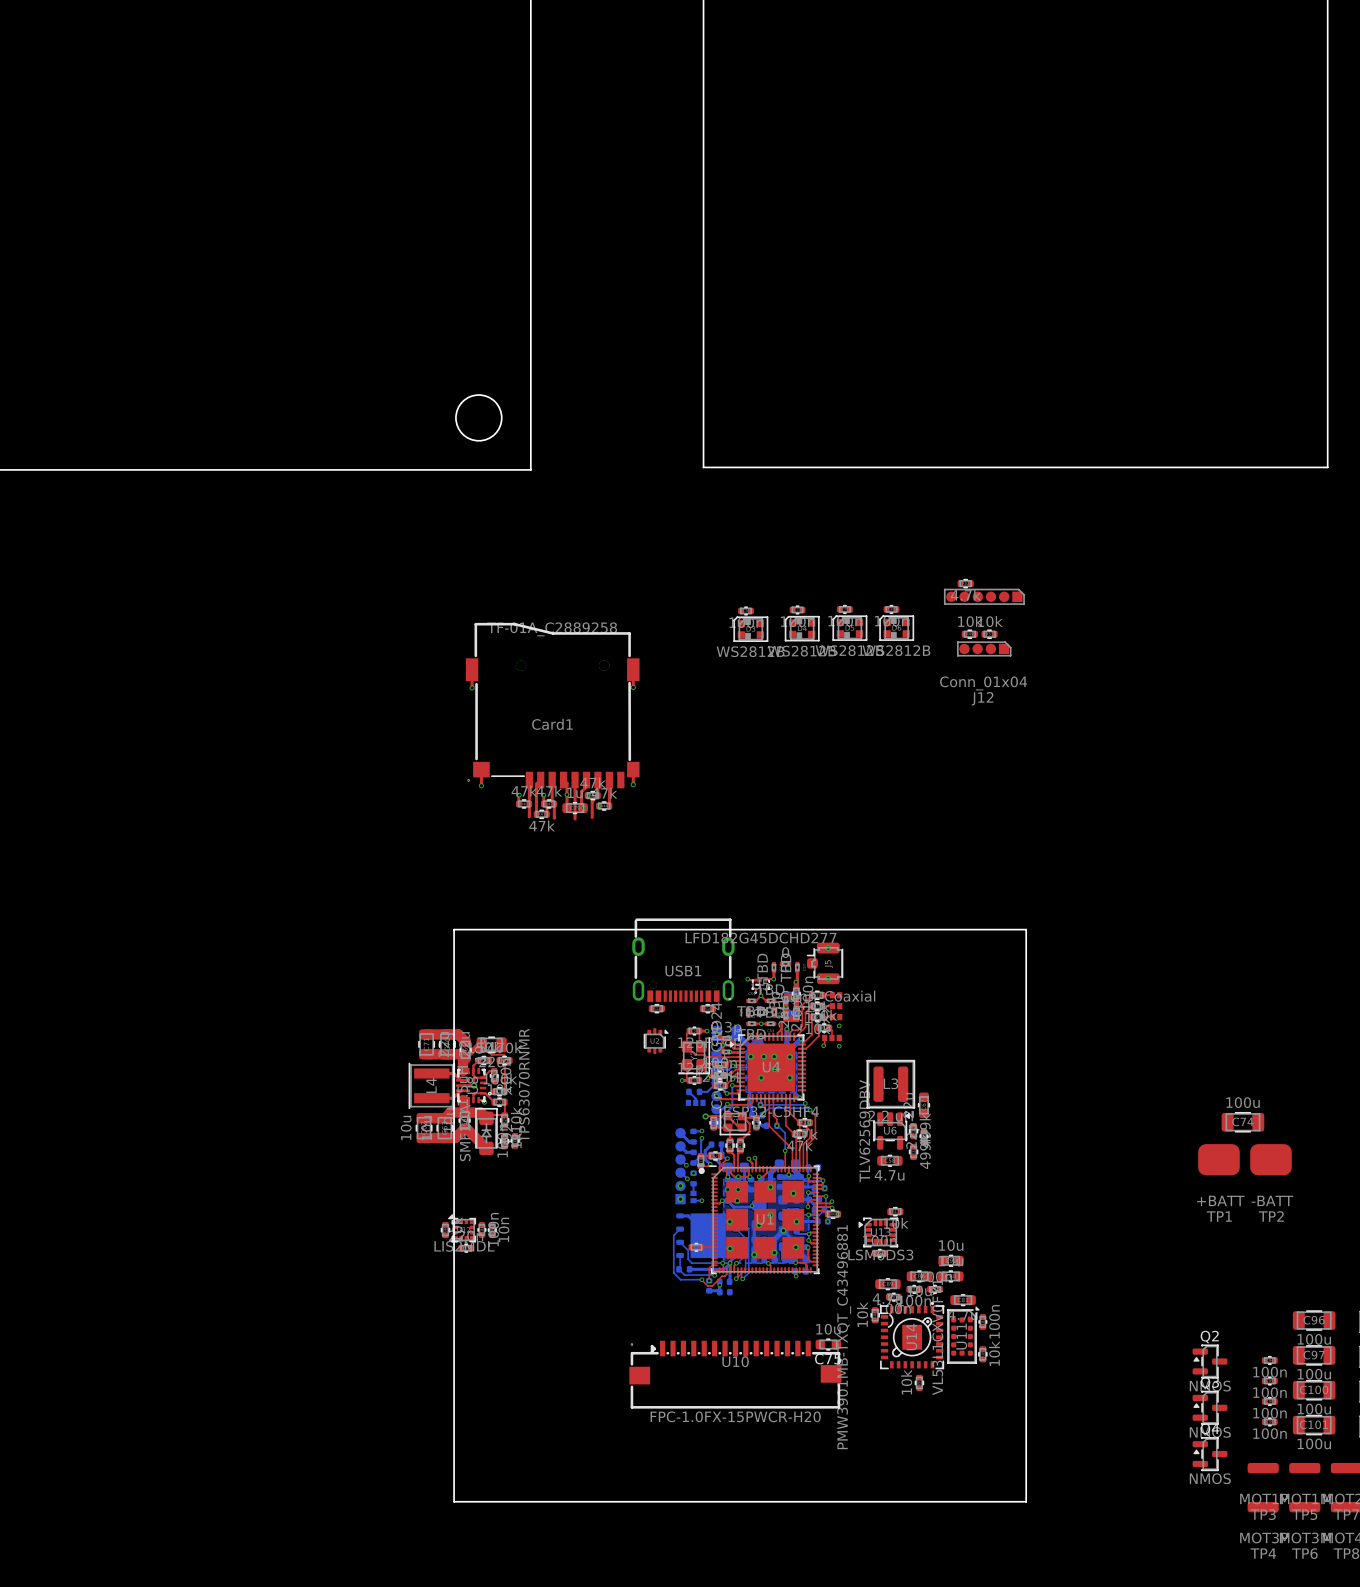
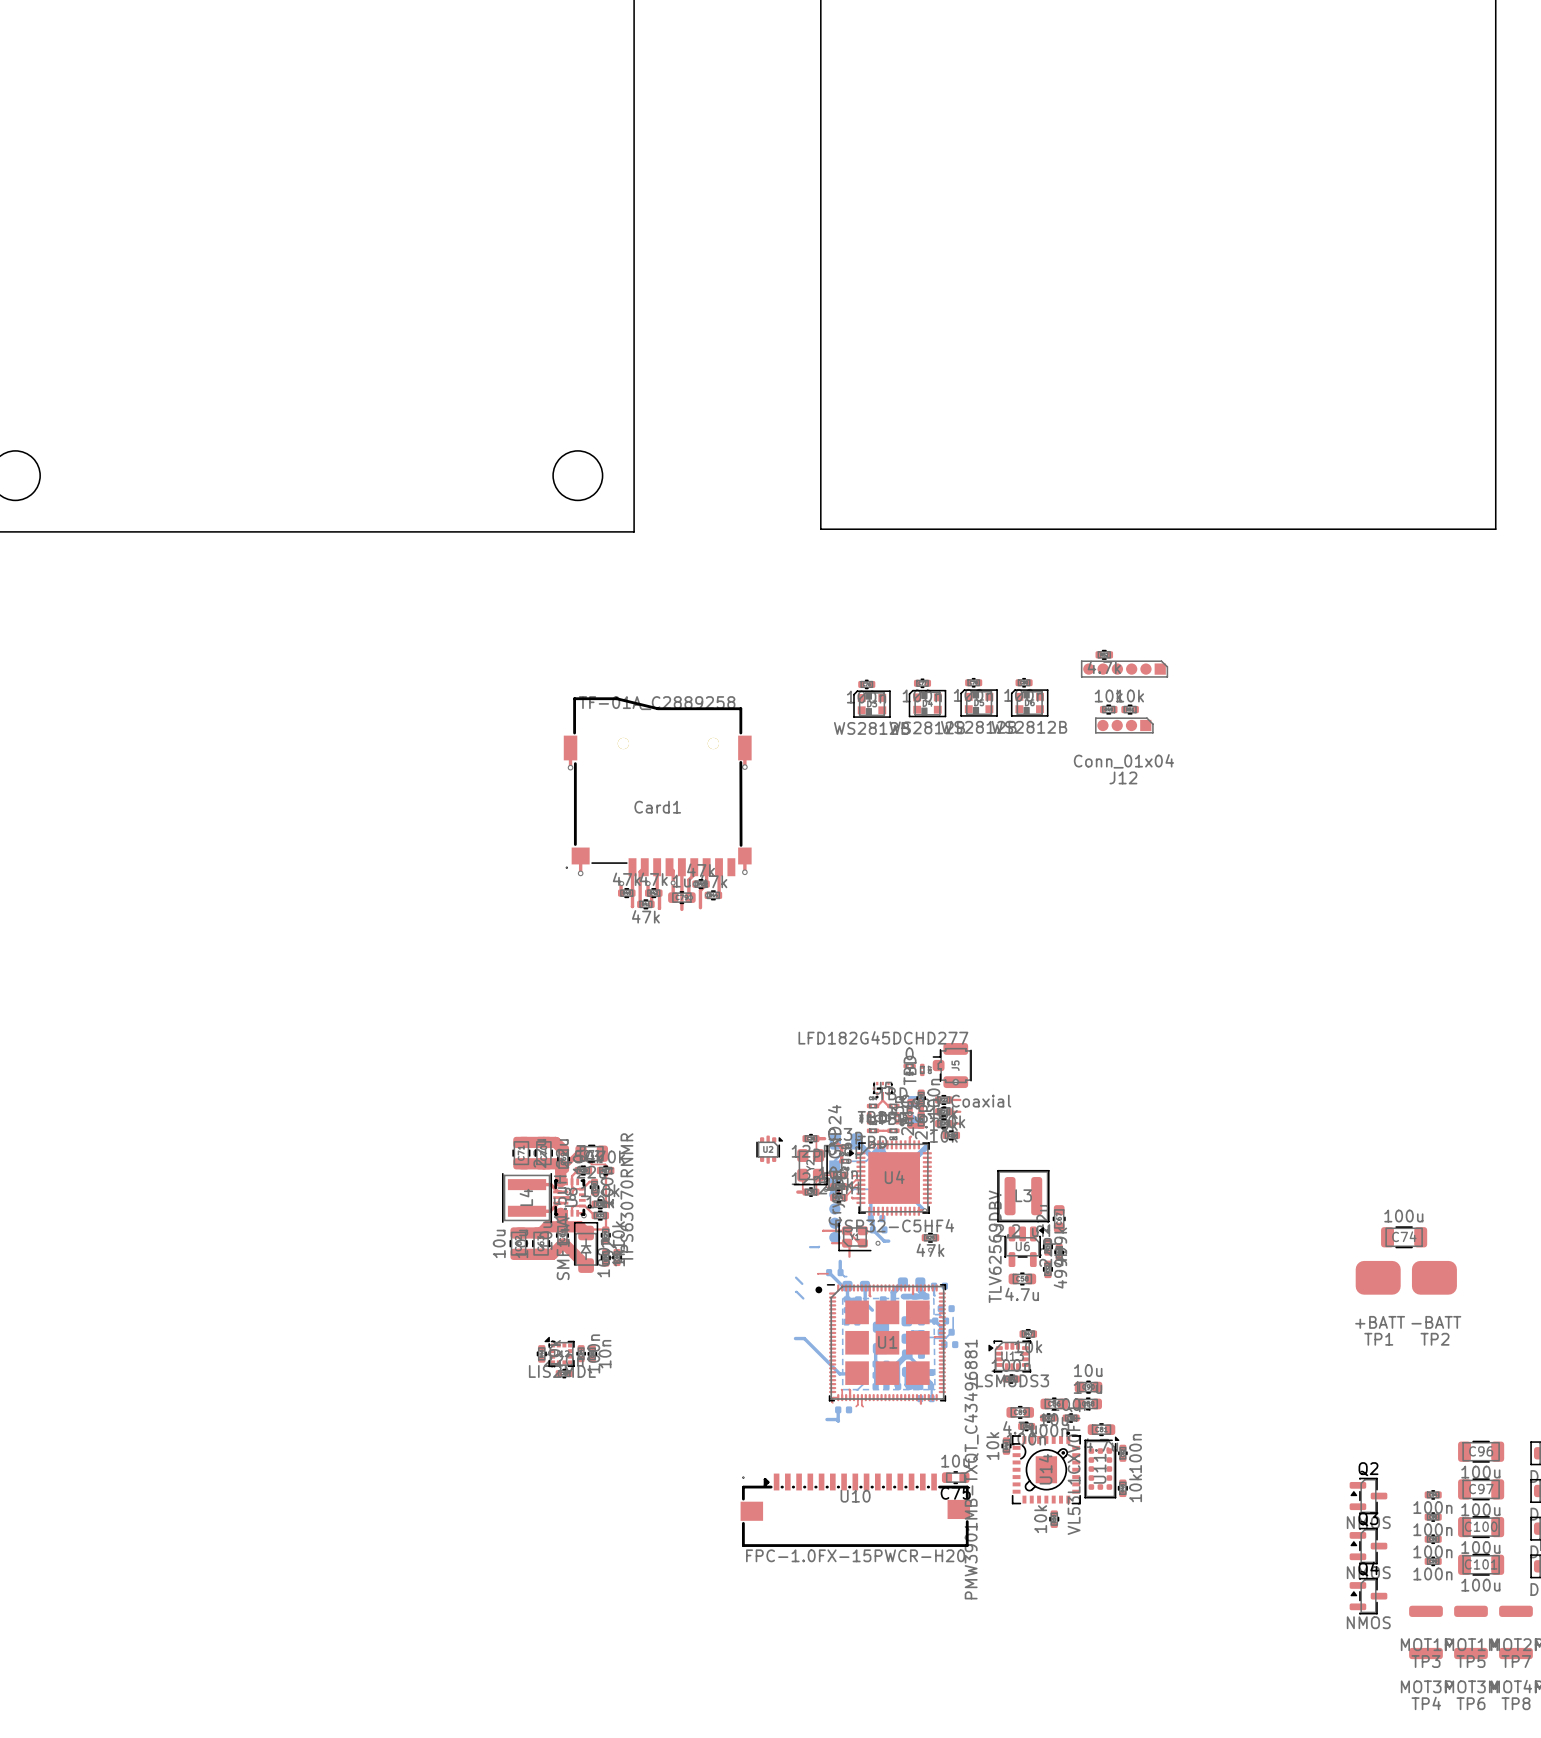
board edge: (454, 929) (1026, 929) (1026, 1501) (454, 1501) (454, 929) -> none
via: (828, 948) -> none
USB1: (683, 960) -> none
part: TBD (773, 967) -> none
top track: (773, 970) (773, 978) (766, 980) -> none
top track: (797, 970) (796, 988) -> none
top track: (747, 979) (755, 980) -> none
via: (747, 979) -> none
via: (773, 979) -> none
via: (796, 982) -> none
via: (760, 995) -> none
top track: (812, 995) (802, 1004) (802, 1025) (797, 1030) (792, 1030) (790, 1036) -> none
part: (836, 995) -> none
top track: (812, 1006) (805, 1012) (805, 1027) (794, 1036) -> none
part: (836, 1006) -> none
part: (656, 1008) -> none
part: (707, 1008) -> none
top track: (812, 1017) (812, 1034) (802, 1044) -> none
part: (836, 1017) -> none
top track: (785, 1019) (781, 1023) (781, 1036) -> none
via: (761, 1023) -> none
via: (839, 1025) -> none
top track: (818, 1028) (818, 1036) (806, 1048) (802, 1048) -> none
top track: (829, 1028) (831, 1030) (831, 1037) -> none
top track: (781, 1029) (777, 1033) -> none
bottom track: (786, 1029) (786, 1044) (789, 1047) -> none
via: (786, 1029) -> none
top track: (689, 1031) (686, 1033) (686, 1046) (695, 1054) (704, 1054) (706, 1057) (740, 1057) -> none
via: (707, 1031) -> none
top track: (824, 1037) (823, 1045) -> none
part: (831, 1037) -> none
top track: (729, 1038) (735, 1044) (740, 1044) -> none
via: (801, 1038) -> none
top track: (722, 1045) (740, 1048) -> none
via: (823, 1045) -> none
via: (839, 1046) -> none
top track: (729, 1051) (740, 1052) -> none
bottom zone outline: (746, 1052) (796, 1052) (796, 1092) (745, 1092) (746, 1052) -> none
via: (750, 1056) -> none
via: (763, 1056) -> none
via: (774, 1056) -> none
via: (789, 1057) -> none
top track: (740, 1061) (729, 1061) (725, 1064) -> none
via: (732, 1065) -> none
bottom track: (751, 1067) (732, 1065) (729, 1069) (716, 1069) -> none
via: (774, 1069) -> none
via: (761, 1077) -> none
via: (789, 1077) -> none
via: (732, 1079) -> none
via: (682, 1080) -> none
bottom track: (732, 1085) (732, 1106) (716, 1122) -> none
via: (732, 1085) -> none
top track: (740, 1090) (737, 1093) (726, 1093) -> none
bottom track: (688, 1091) (695, 1098) (695, 1102) -> none
part: (694, 1091) -> none
bottom track: (699, 1091) (707, 1091) (716, 1082) (726, 1093) -> none
via: (726, 1093) -> none
top track: (716, 1096) (719, 1099) (748, 1098) -> none
via: (716, 1096) -> none
top track: (752, 1098) (750, 1104) (727, 1104) -> none
top track: (765, 1098) (763, 1113) -> none
top track: (769, 1098) (769, 1126) (792, 1149) (792, 1169) -> none
top track: (773, 1098) (773, 1115) (776, 1119) (776, 1125) -> none
top track: (785, 1098) (785, 1125) (796, 1135) (796, 1169) -> none
top track: (790, 1098) (790, 1113) (799, 1123) -> none
part: (695, 1102) -> none
top track: (805, 1103) (805, 1126) (810, 1130) (810, 1137) (803, 1144) (803, 1169) -> none
bottom track: (805, 1103) (760, 1104) -> none
via: (805, 1103) -> none
bottom track: (727, 1104) (722, 1109) (716, 1109) -> none
via: (727, 1104) -> none
via: (760, 1104) -> none
top track: (810, 1110) (815, 1115) (815, 1136) (807, 1145) (807, 1169) -> none
bottom track: (810, 1110) (807, 1108) (769, 1108) (763, 1113) -> none
via: (810, 1110) -> none
via: (763, 1113) -> none
via: (705, 1116) -> none
top track: (742, 1116) (749, 1123) (749, 1131) (740, 1140) -> none
top track: (743, 1117) (756, 1117) -> none
part: (713, 1122) -> none
part: (756, 1122) -> none
via: (810, 1122) -> none
top track: (799, 1123) (799, 1169) -> none
part: (771, 1125) -> none
bottom track: (776, 1125) (785, 1133) (785, 1150) -> none
via: (776, 1125) -> none
via: (701, 1131) -> none
bottom track: (680, 1133) (689, 1141) (693, 1141) -> none
part: 47k (799, 1134) -> none
part: (693, 1136) -> none
bottom track: (701, 1138) (701, 1155) (693, 1162) -> none
via: (701, 1138) -> none
bottom track: (711, 1144) (705, 1150) (705, 1159) (710, 1164) -> none
part: (716, 1144) -> none
part: (730, 1145) -> none
part: (740, 1145) -> none
bottom track: (680, 1146) (686, 1152) (693, 1152) -> none
top track: (730, 1150) (734, 1155) (734, 1169) -> none
top track: (740, 1150) (737, 1153) (737, 1169) -> none
top track: (785, 1150) (785, 1169) -> none
via: (785, 1150) -> none
part: (715, 1155) -> none
top track: (720, 1155) (719, 1169) -> none
part: (693, 1157) -> none
top track: (727, 1158) (723, 1162) (723, 1169) -> none
via: (727, 1158) -> none
top track: (748, 1158) (752, 1163) (752, 1169) -> none
via: (748, 1158) -> none
top track: (755, 1158) (756, 1169) -> none
via: (755, 1158) -> none
part: (700, 1163) -> none
top track: (710, 1164) (700, 1166) -> none
via: (710, 1164) -> none
via: (686, 1165) -> none
part: (680, 1166) -> none
top track: (730, 1169) (730, 1172) (734, 1176) (750, 1176) -> none
top track: (766, 1169) (766, 1172) (763, 1176) (759, 1176) -> none
via: (693, 1173) -> none
via: (788, 1174) -> none
via: (727, 1176) -> none
via: (738, 1176) -> none
via: (750, 1176) -> none
via: (759, 1176) -> none
bottom track: (800, 1176) (804, 1181) (823, 1180) -> none
top track: (808, 1176) (809, 1181) (815, 1181) -> none
via: (808, 1176) -> none
top track: (815, 1177) (820, 1177) (823, 1180) (821, 1185) (815, 1185) -> none
via: (687, 1178) -> none
part: (693, 1178) -> none
via: (823, 1180) -> none
part: (779, 1181) -> none
bottom track: (693, 1183) (693, 1193) -> none
part: (751, 1184) -> none
via: (680, 1185) -> none
bottom track: (800, 1186) (814, 1188) -> none
via: (770, 1187) -> none
top track: (825, 1188) (815, 1188) -> none
via: (825, 1188) -> none
via: (727, 1189) -> none
via: (738, 1189) -> none
top track: (808, 1192) (815, 1192) -> none
via: (808, 1192) -> none
via: (793, 1193) -> none
top track: (815, 1196) (825, 1196) -> none
via: (825, 1196) -> none
part: (693, 1197) -> none
via: (680, 1199) -> none
top track: (815, 1199) (811, 1199) (807, 1202) (807, 1206) -> none
bottom track: (693, 1200) (701, 1200) -> none
via: (701, 1200) -> none
top track: (722, 1200) (719, 1203) (714, 1203) -> none
bottom track: (722, 1200) (727, 1200) (733, 1207) (757, 1207) (759, 1205) (751, 1205) -> none
via: (722, 1200) -> none
via: (737, 1200) -> none
via: (831, 1201) -> none
top track: (831, 1202) (815, 1203) -> none
via: (751, 1205) -> none
via: (807, 1206) -> none
top track: (815, 1207) (830, 1207) -> none
via: (832, 1207) -> none
top track: (815, 1210) (824, 1210) (827, 1214) -> none
via: (808, 1214) -> none
part: (833, 1214) -> none
via: (838, 1214) -> none
bottom track: (736, 1215) (748, 1228) (748, 1272) (742, 1278) -> none
via: (770, 1215) -> none
via: (729, 1221) -> none
via: (796, 1221) -> none
bottom track: (817, 1221) (796, 1221) -> none
via: (827, 1221) -> none
via: (759, 1225) -> none
bottom track: (680, 1229) (673, 1235) (673, 1272) (680, 1279) (701, 1279) -> none
bottom track: (736, 1229) (745, 1238) (745, 1269) (736, 1278) -> none
via: (783, 1230) -> none
bottom track: (796, 1231) (798, 1233) (809, 1233) -> none
top track: (815, 1232) (809, 1233) -> none
via: (809, 1233) -> none
part: (708, 1235) -> none
top track: (808, 1240) (811, 1243) (815, 1243) -> none
via: (808, 1240) -> none
bottom track: (680, 1242) (688, 1250) (688, 1259) (691, 1263) (722, 1263) -> none
part: (696, 1247) -> none
top track: (714, 1247) (701, 1247) -> none
via: (795, 1247) -> none
top track: (808, 1247) (808, 1258) (810, 1261) (815, 1261) -> none
via: (808, 1247) -> none
via: (730, 1248) -> none
via: (774, 1252) -> none
via: (754, 1254) -> none
bottom track: (680, 1255) (678, 1269) (684, 1275) (714, 1275) -> none
bottom track: (736, 1255) (730, 1261) (729, 1281) -> none
top track: (795, 1262) (804, 1262) (807, 1265) (807, 1270) -> none
via: (795, 1262) -> none
via: (722, 1263) -> none
bottom track: (730, 1263) (724, 1269) (689, 1269) -> none
via: (730, 1263) -> none
top track: (736, 1263) (734, 1270) -> none
via: (736, 1263) -> none
top track: (768, 1263) (770, 1270) -> none
via: (768, 1263) -> none
top track: (714, 1265) (709, 1268) (709, 1280) -> none
part: (684, 1269) -> none
top track: (726, 1270) (726, 1274) (712, 1286) (707, 1286) (701, 1279) -> none
via: (714, 1275) -> none
via: (796, 1276) -> none
via: (736, 1278) -> none
via: (742, 1278) -> none
via: (701, 1279) -> none
via: (709, 1280) -> none
part: (709, 1285) -> none
via: (719, 1285) -> none
part: (724, 1292) -> none

